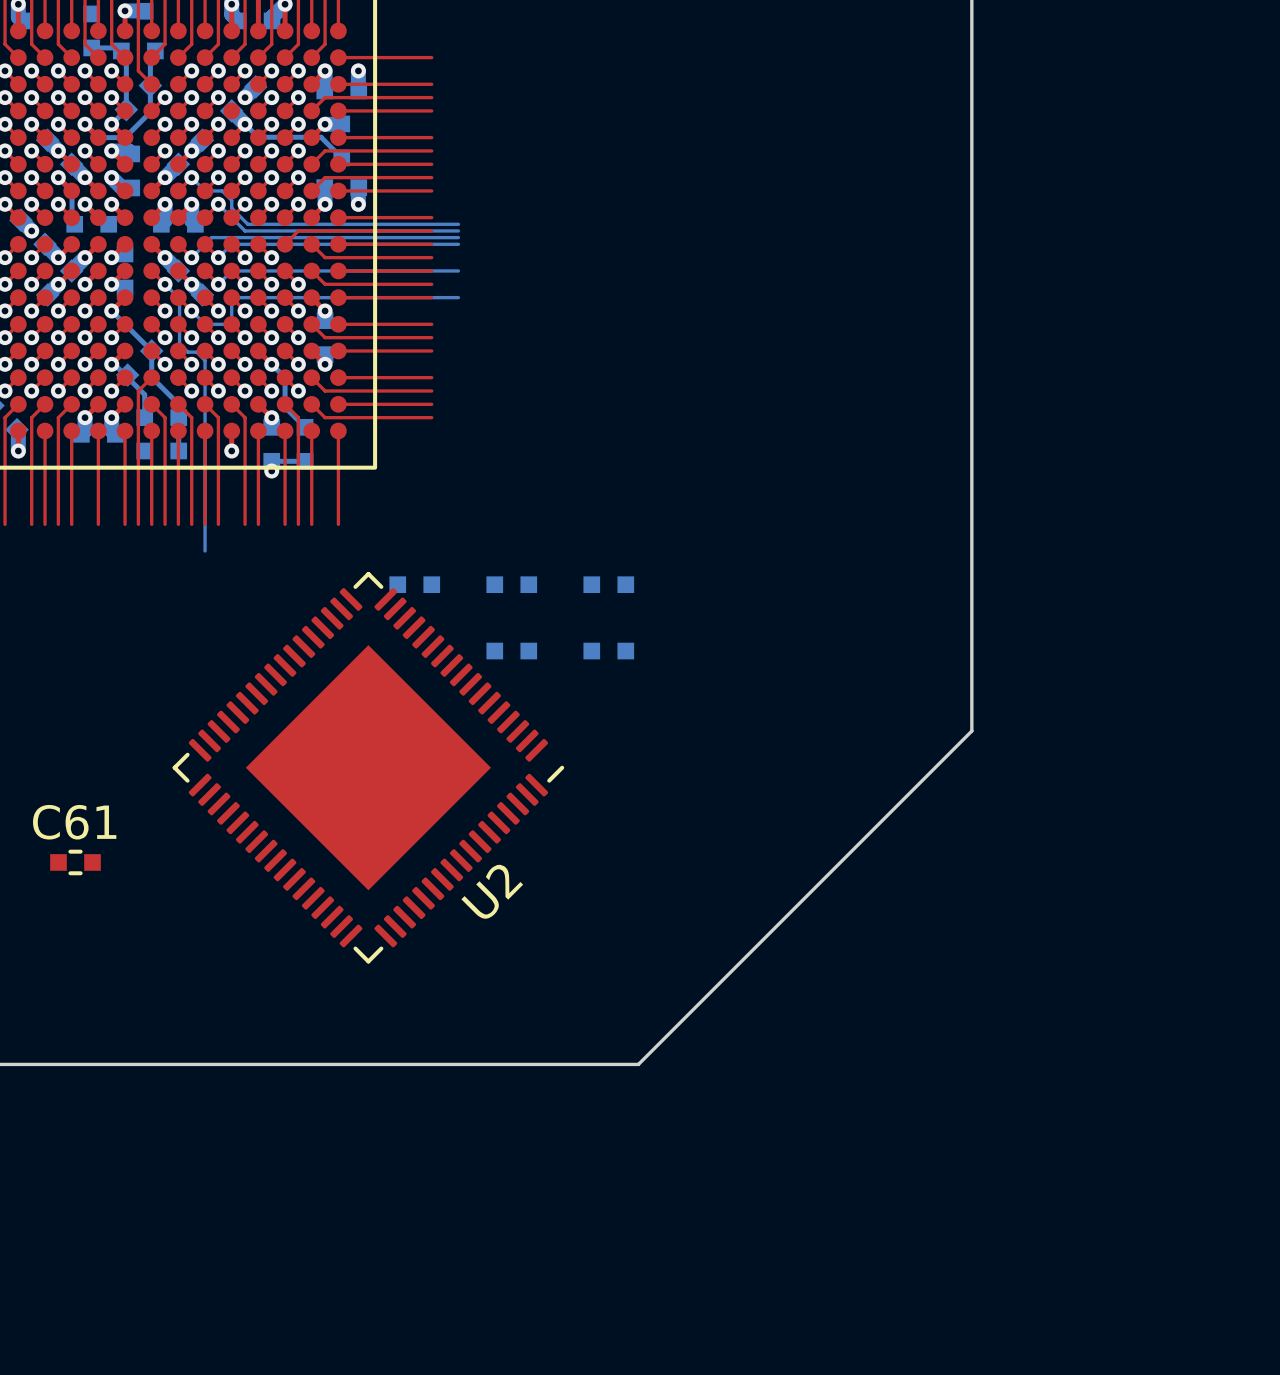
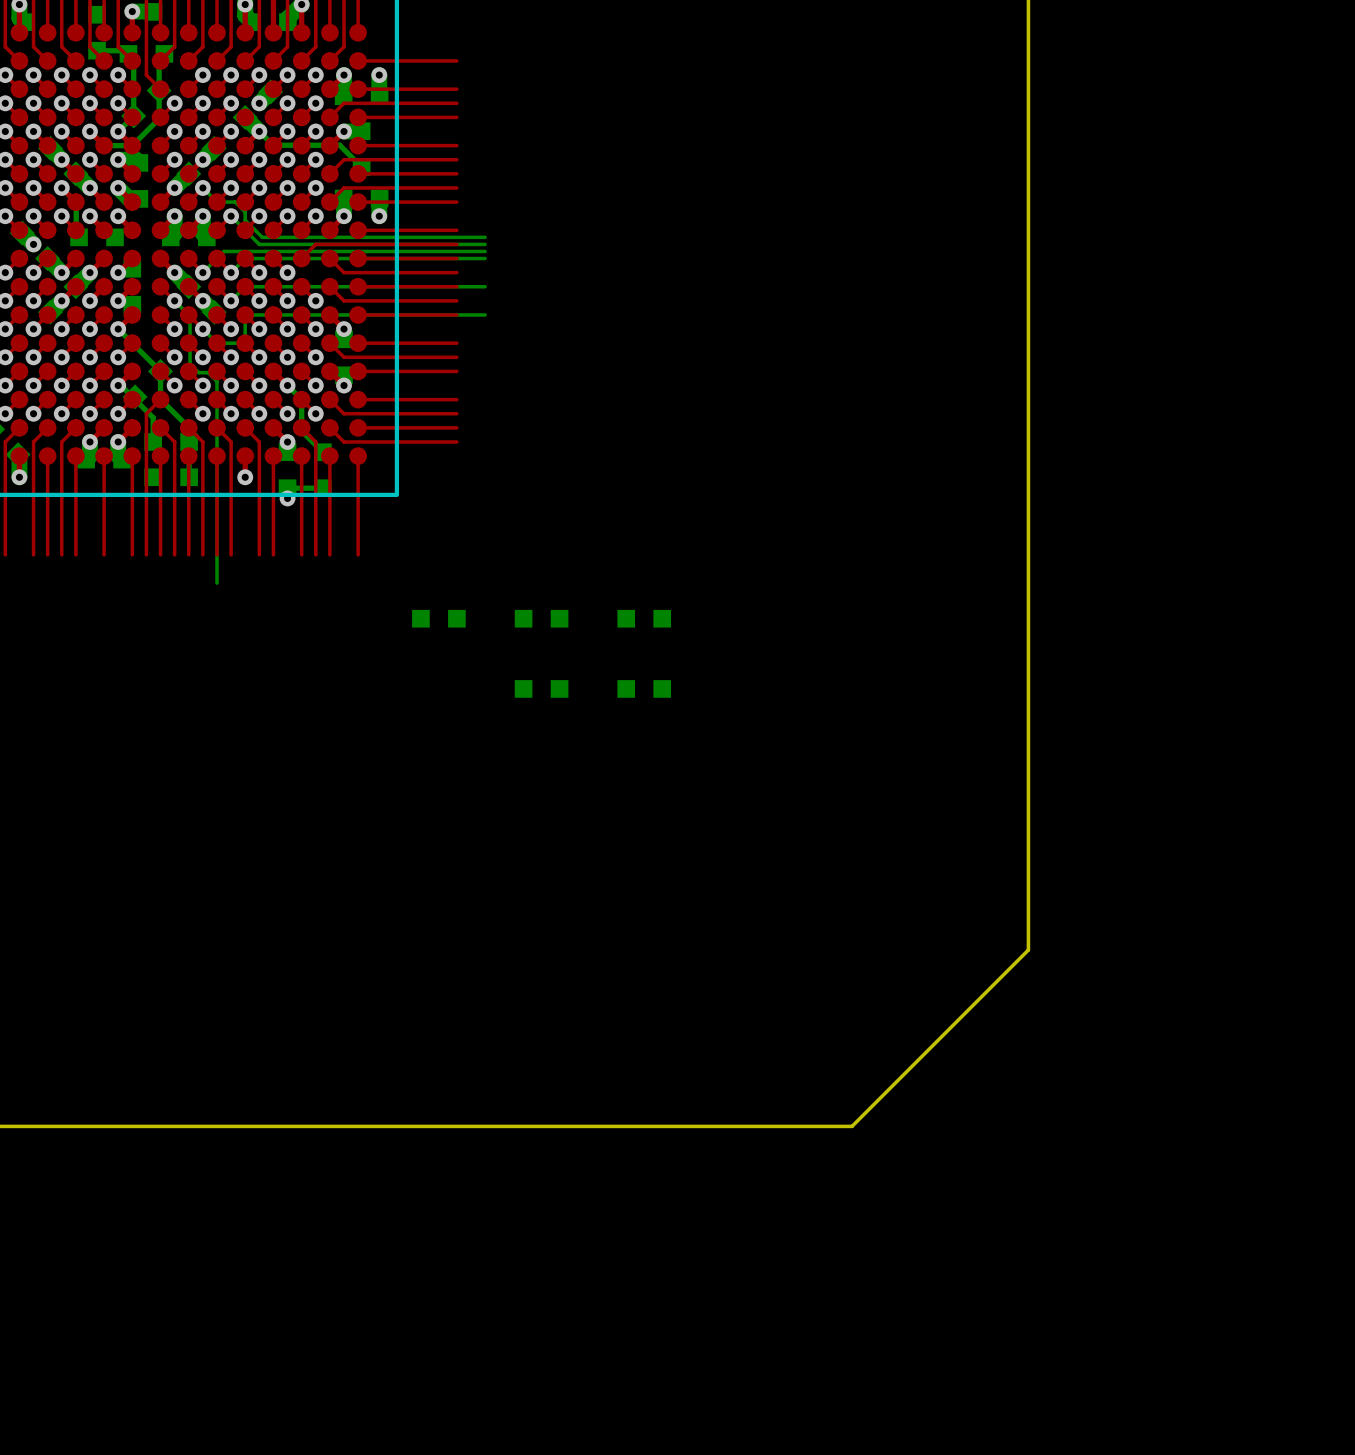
board edge: (971, 731) (638, 1064) -> (1028, 773) (1028, 950) (852, 1126) (675, 1126)
U2: (368, 767) -> none
C61: (75, 862) -> none

